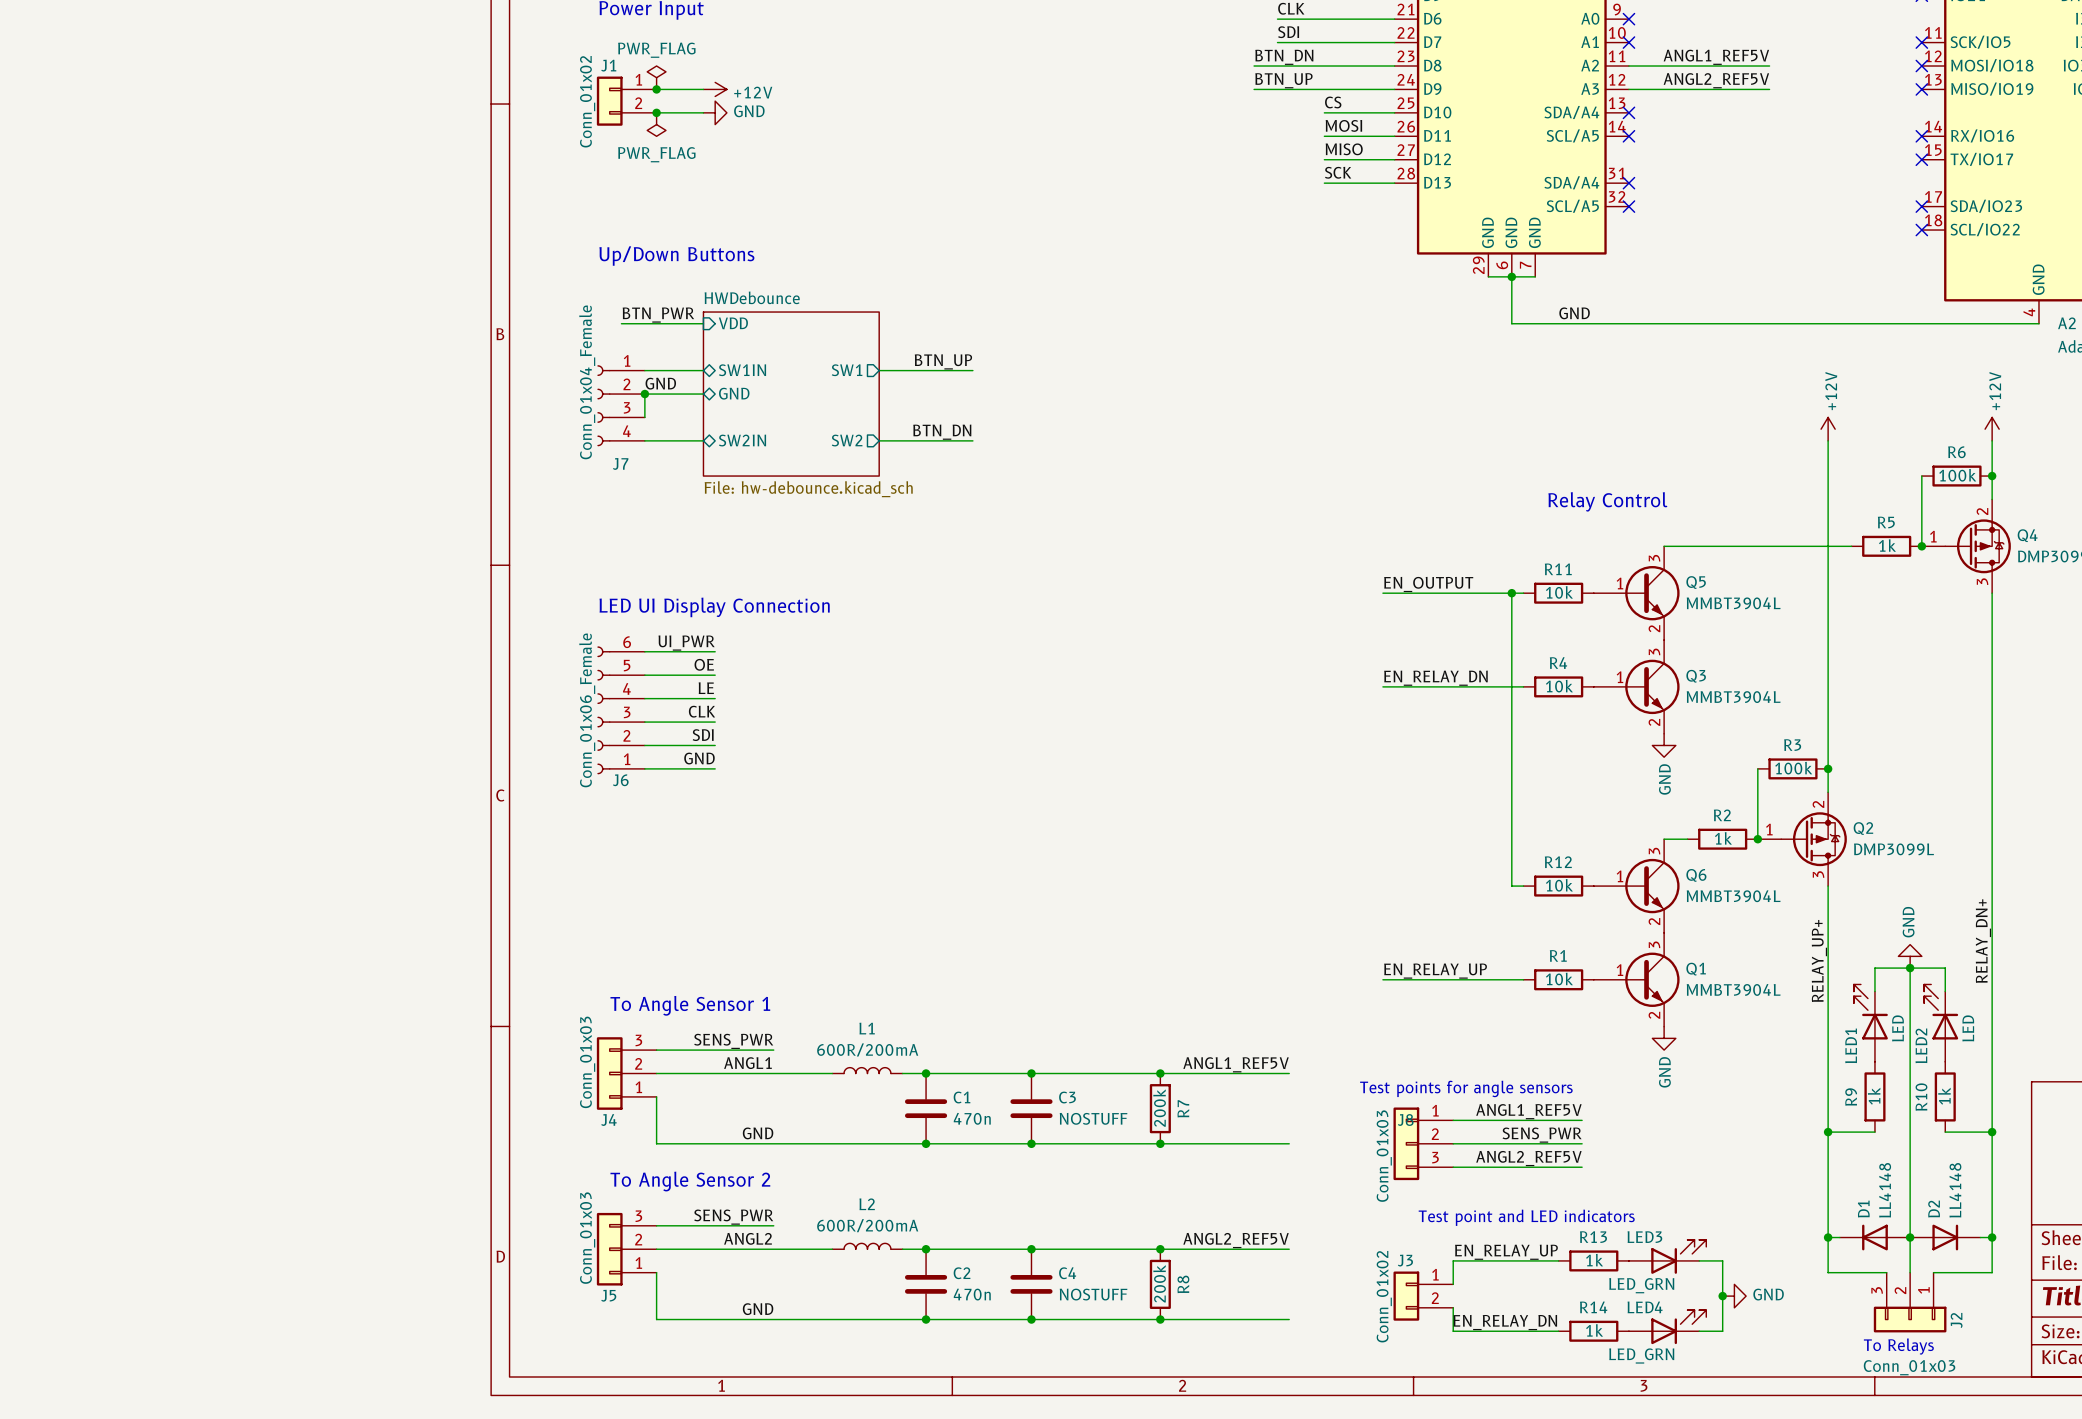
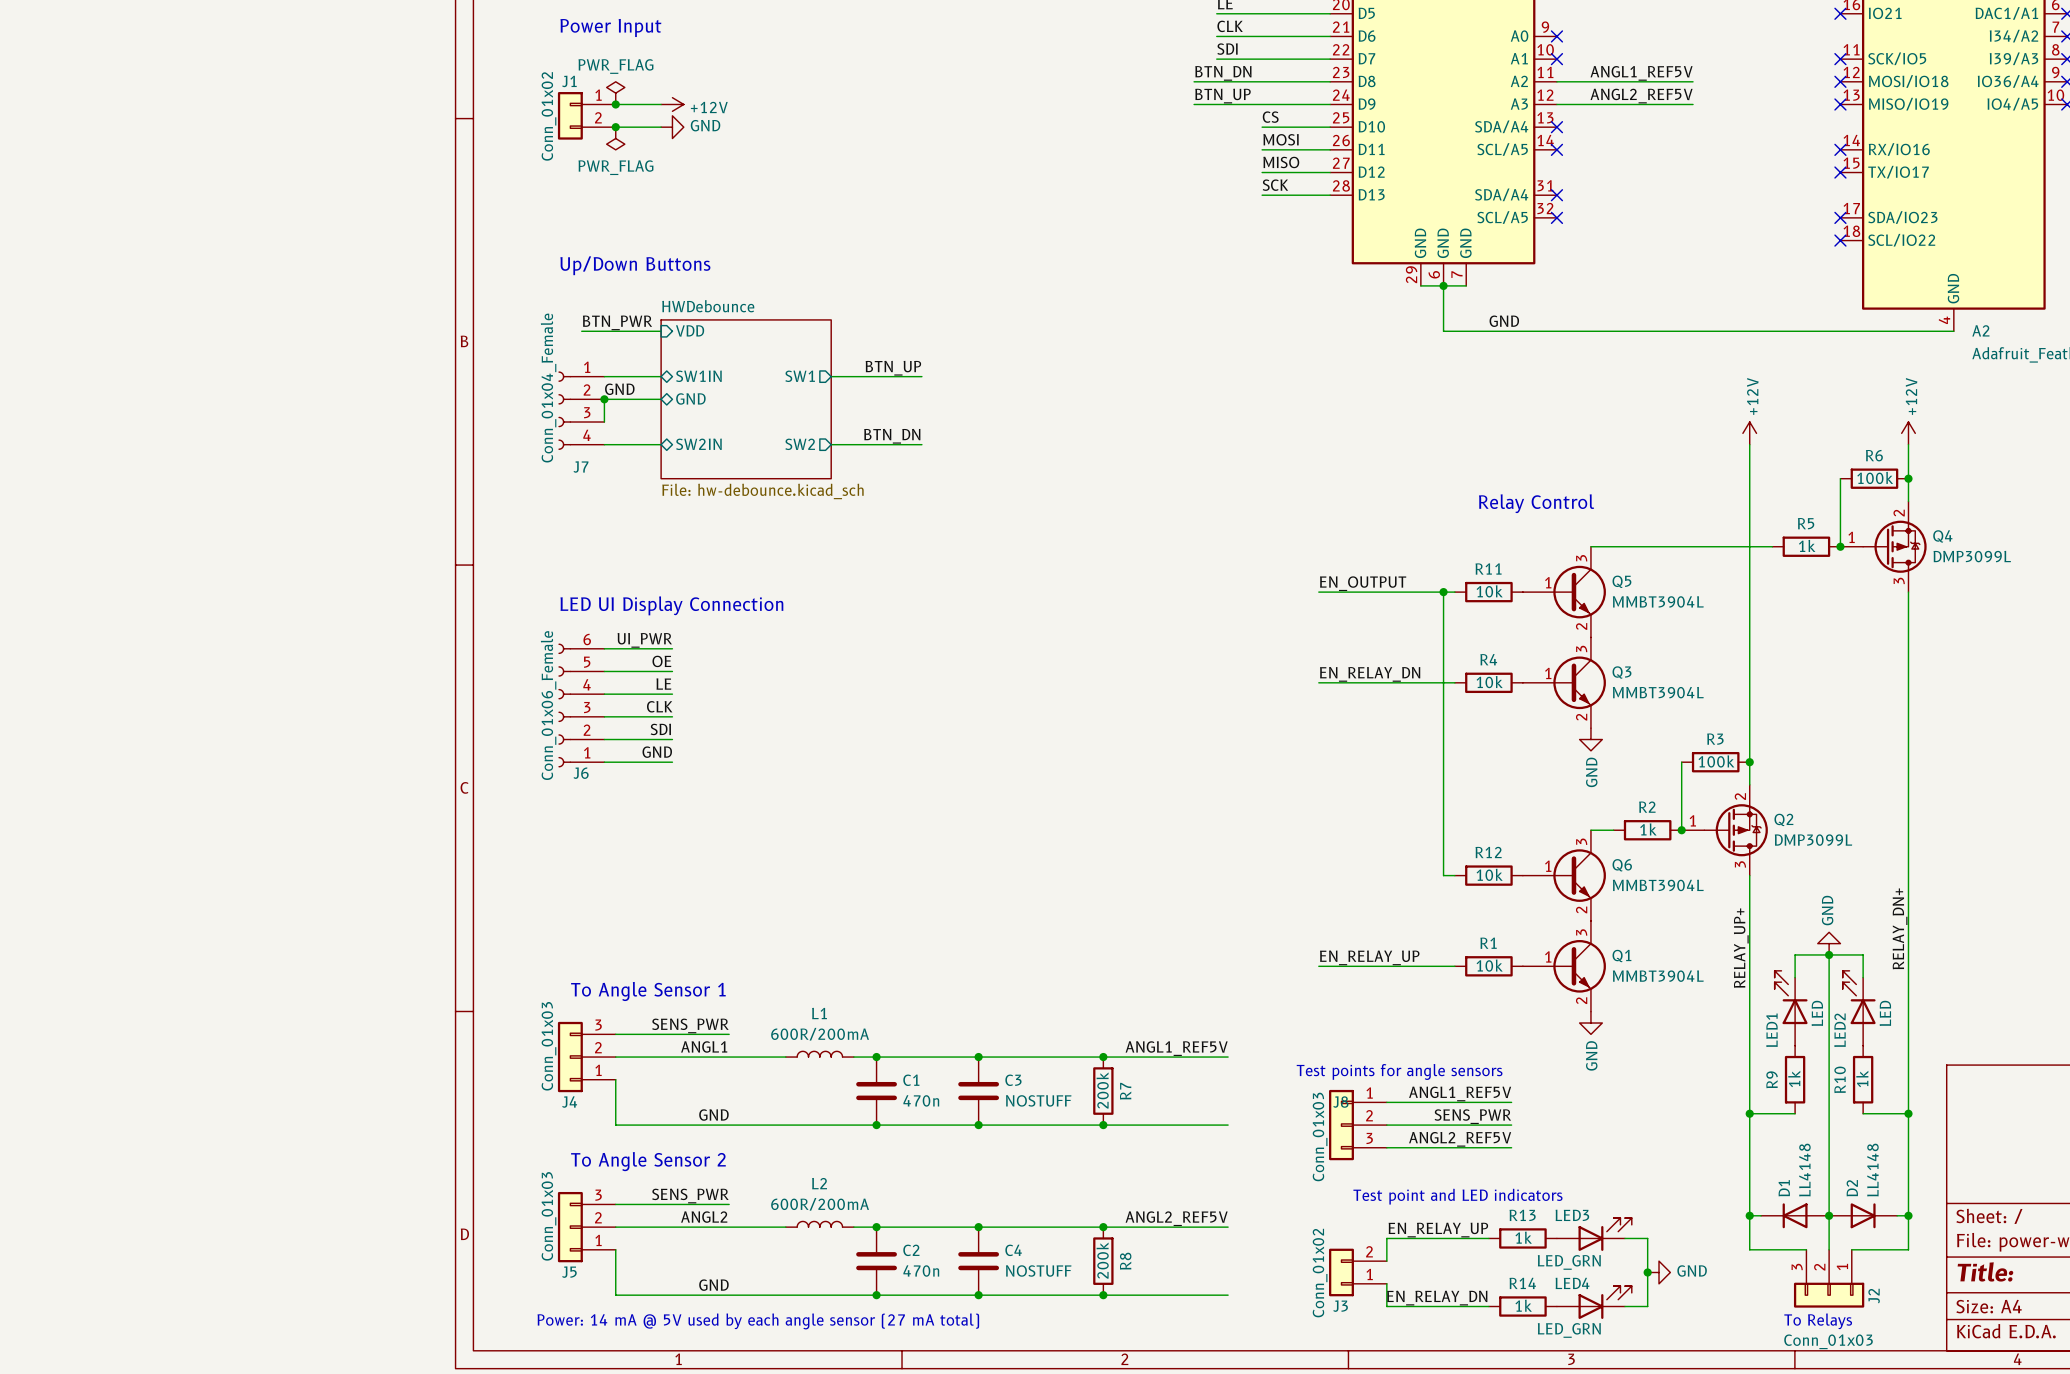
J3 flip: as is (1406, 1296) -> up-down (1341, 1272)
text: none -> Power: 14 mA @ 5V used by each angle sensor (27 mA total) (758, 1321)

